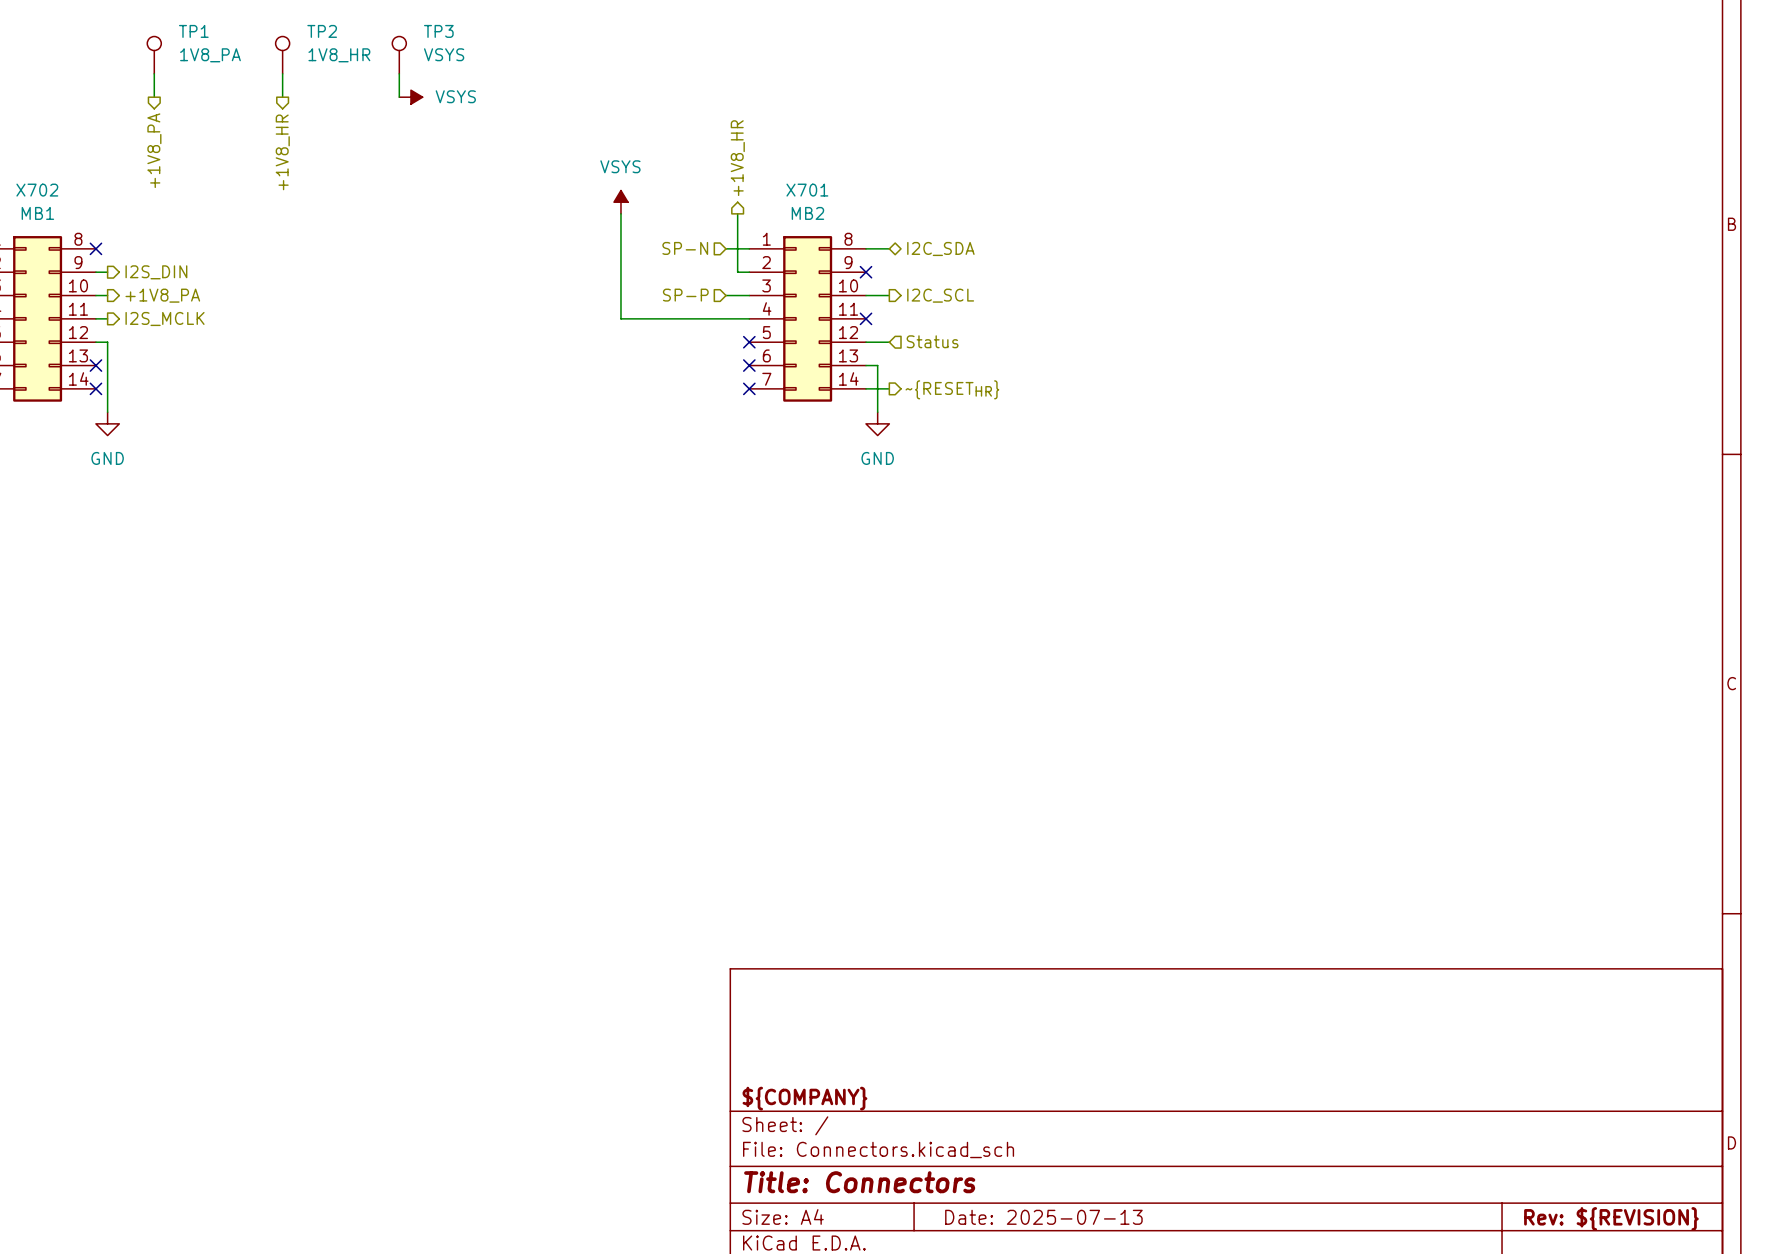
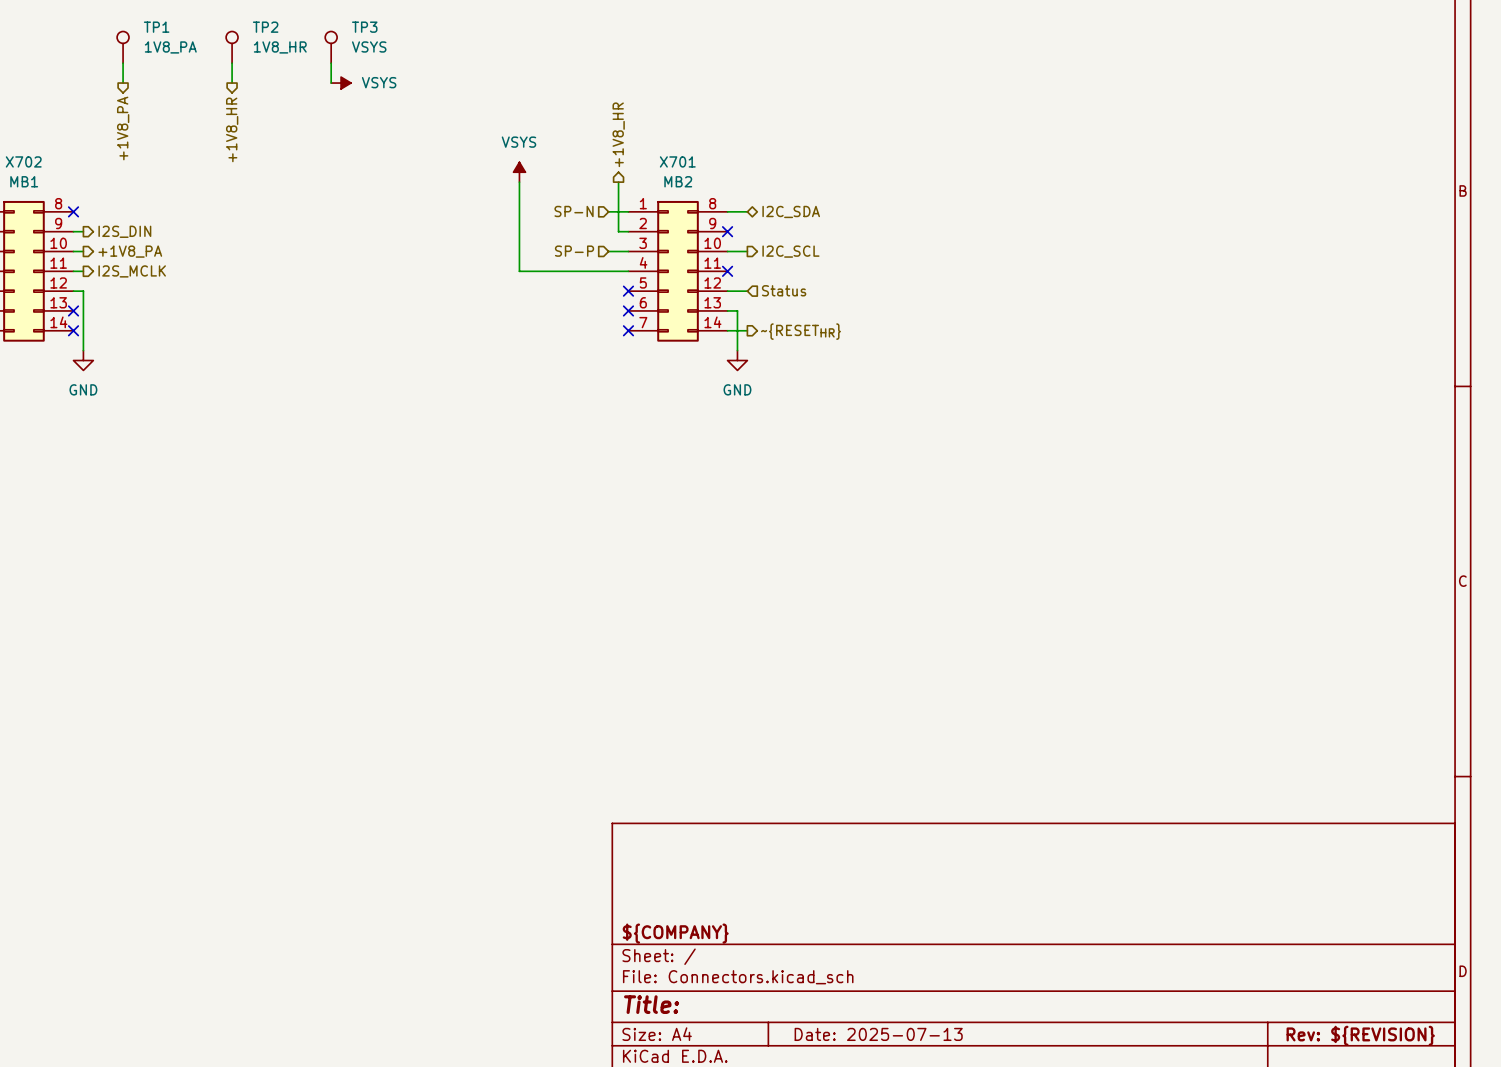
title block: Title: Connectors (859, 1182) -> Title: (651, 1004)

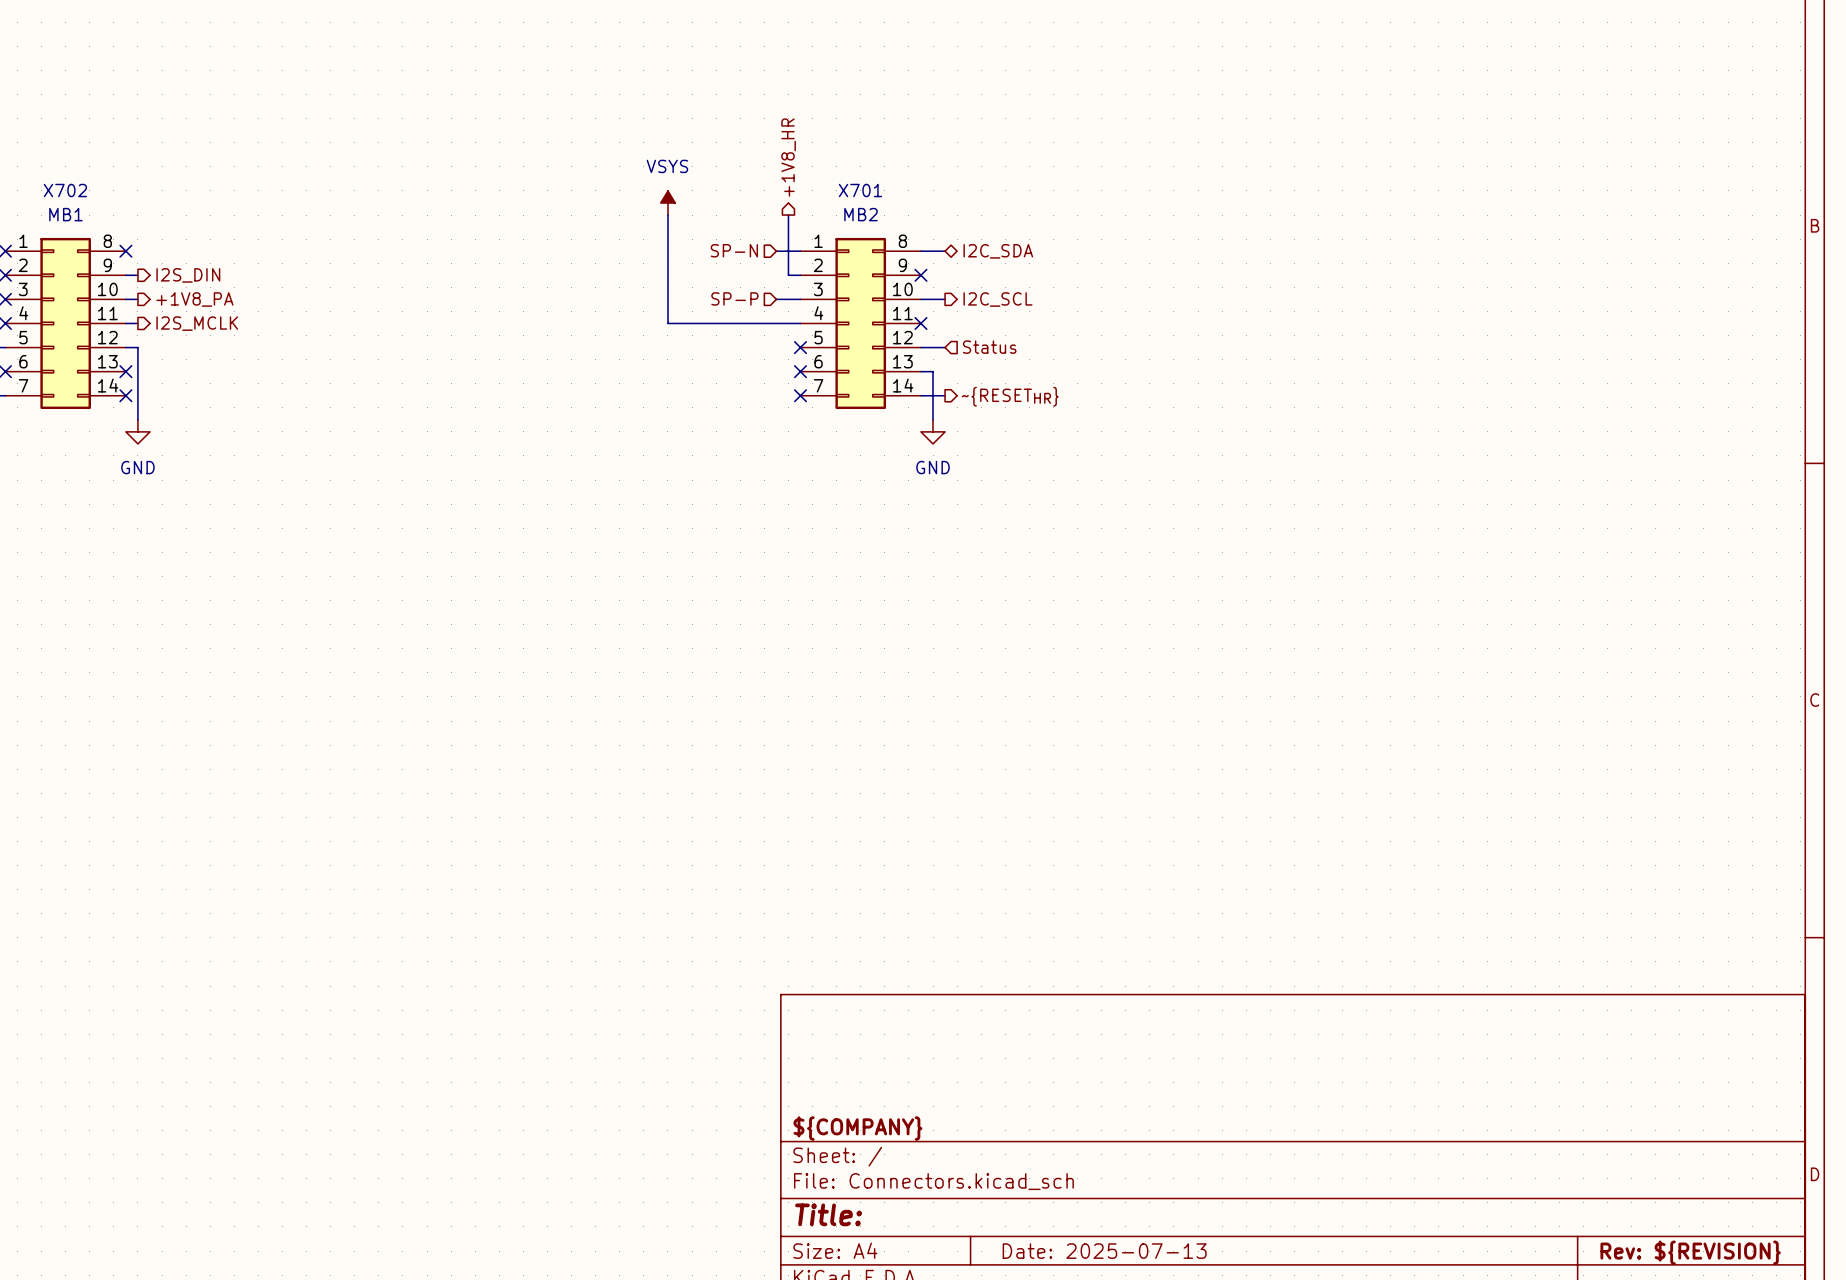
TP1: 1V8_PA (123, 47) -> none
TP2: 1V8_HR (232, 47) -> none
TP3: VSYS (331, 47) -> none
wire: (123, 63) (123, 83) -> none
wire: (232, 63) (232, 83) -> none
wire: (331, 63) (331, 83) -> none
power symbol: VSYS (341, 83) -> none
hierarchical label: +1V8_PA (123, 128) -> none
hierarchical label: +1V8_HR (232, 129) -> none

